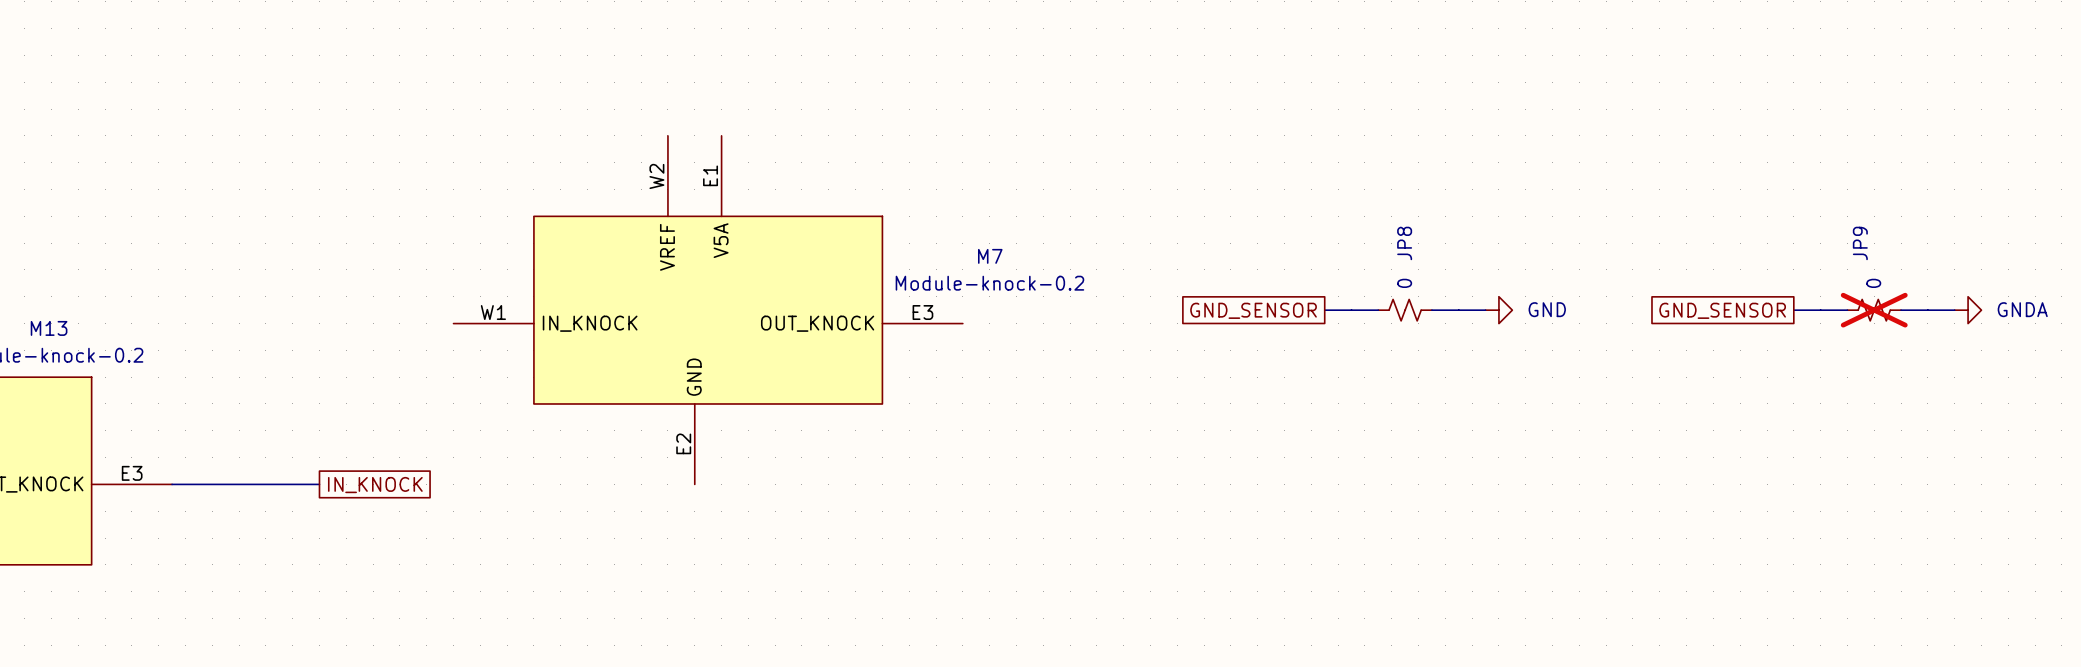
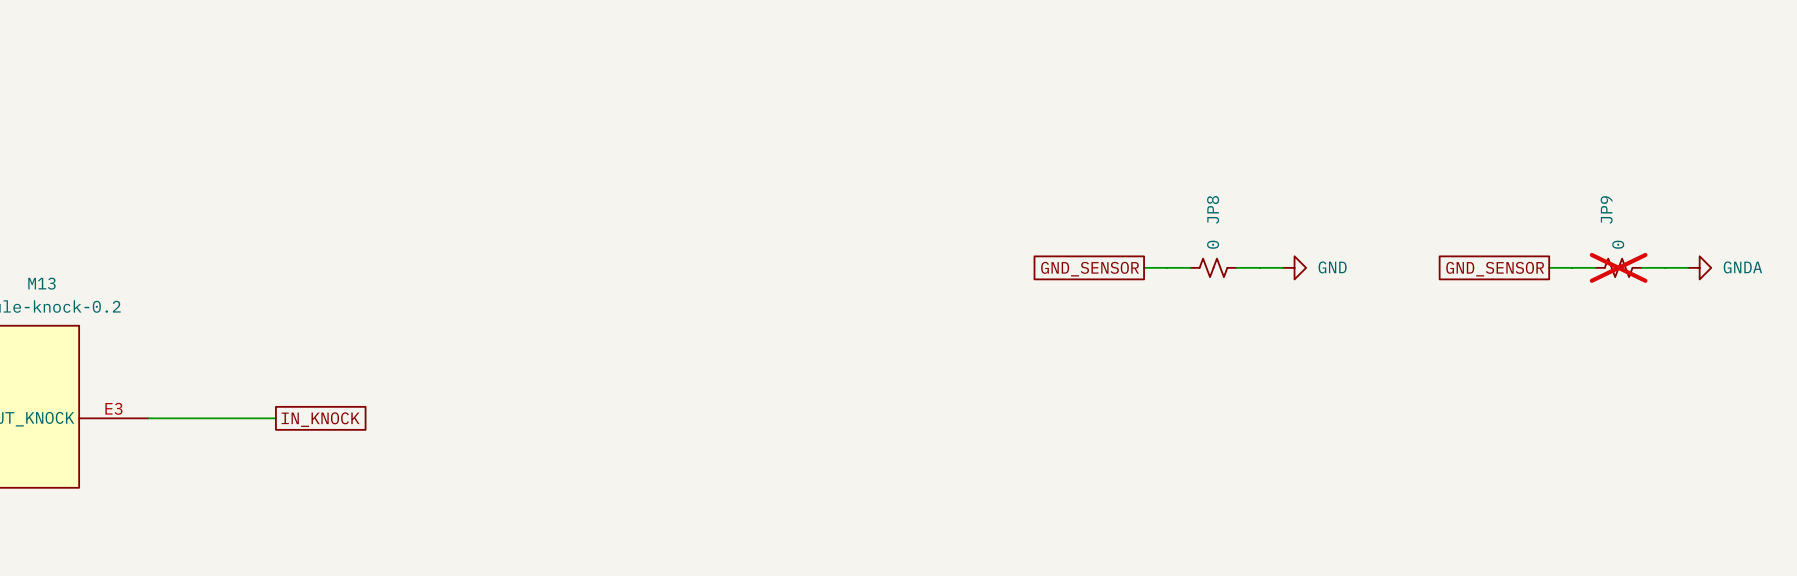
M7: Module-knock-0.2 (708, 310) -> none

